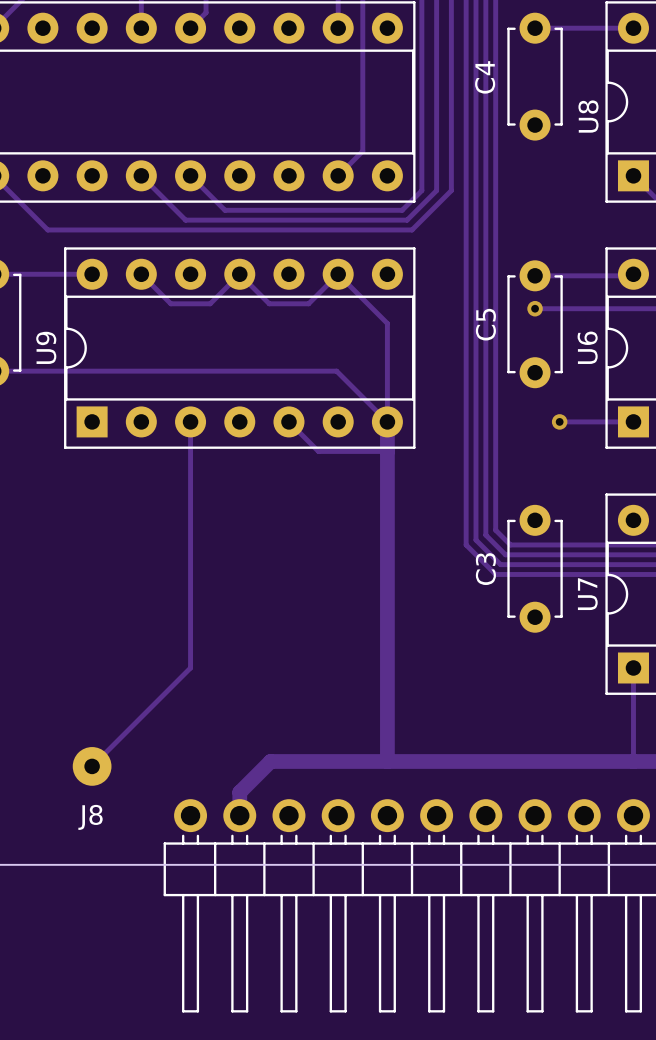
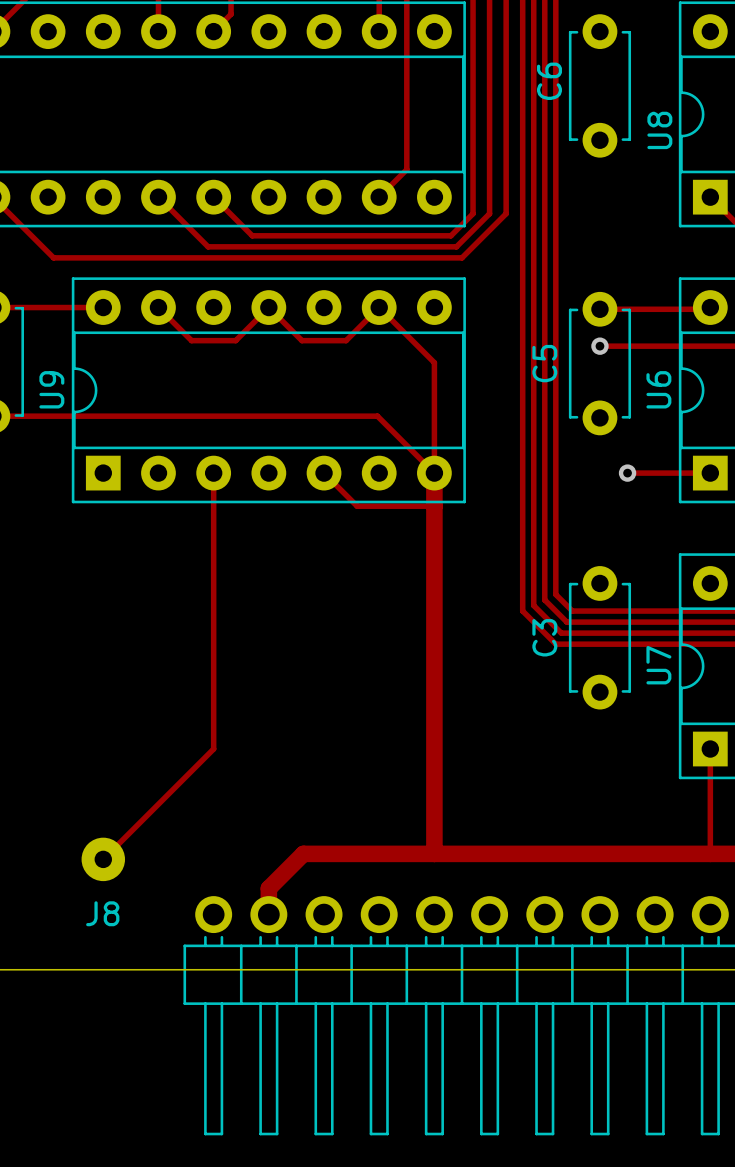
track: (535, 28) (633, 28) -> none
C4 name: C4 (485, 77) -> C6 (549, 81)

